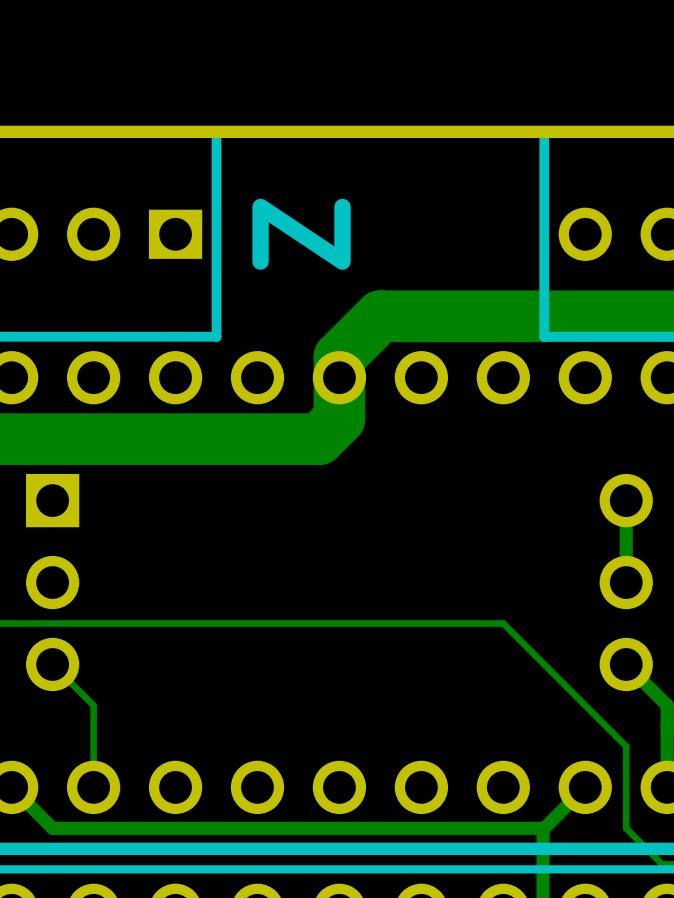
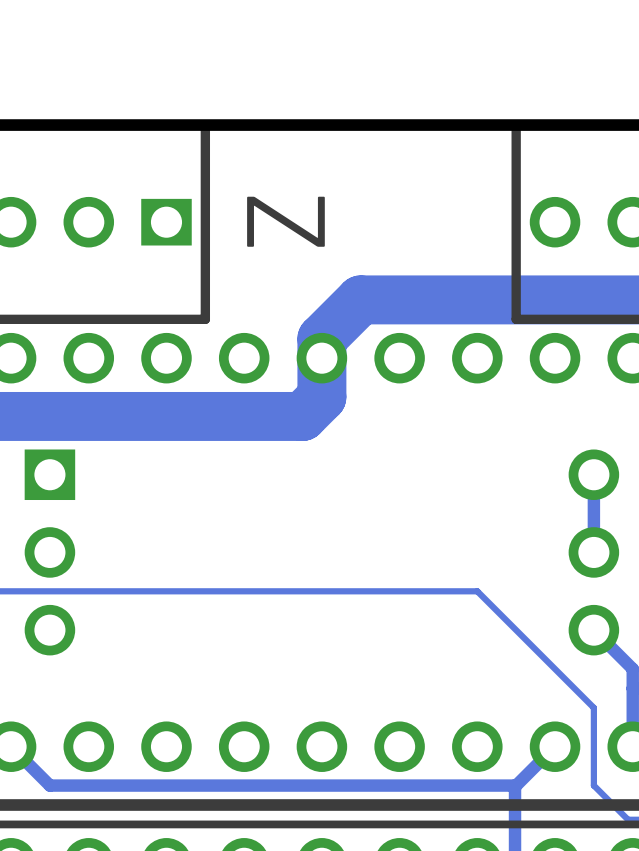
track: (52, 664) (93, 705) (93, 787) -> none

